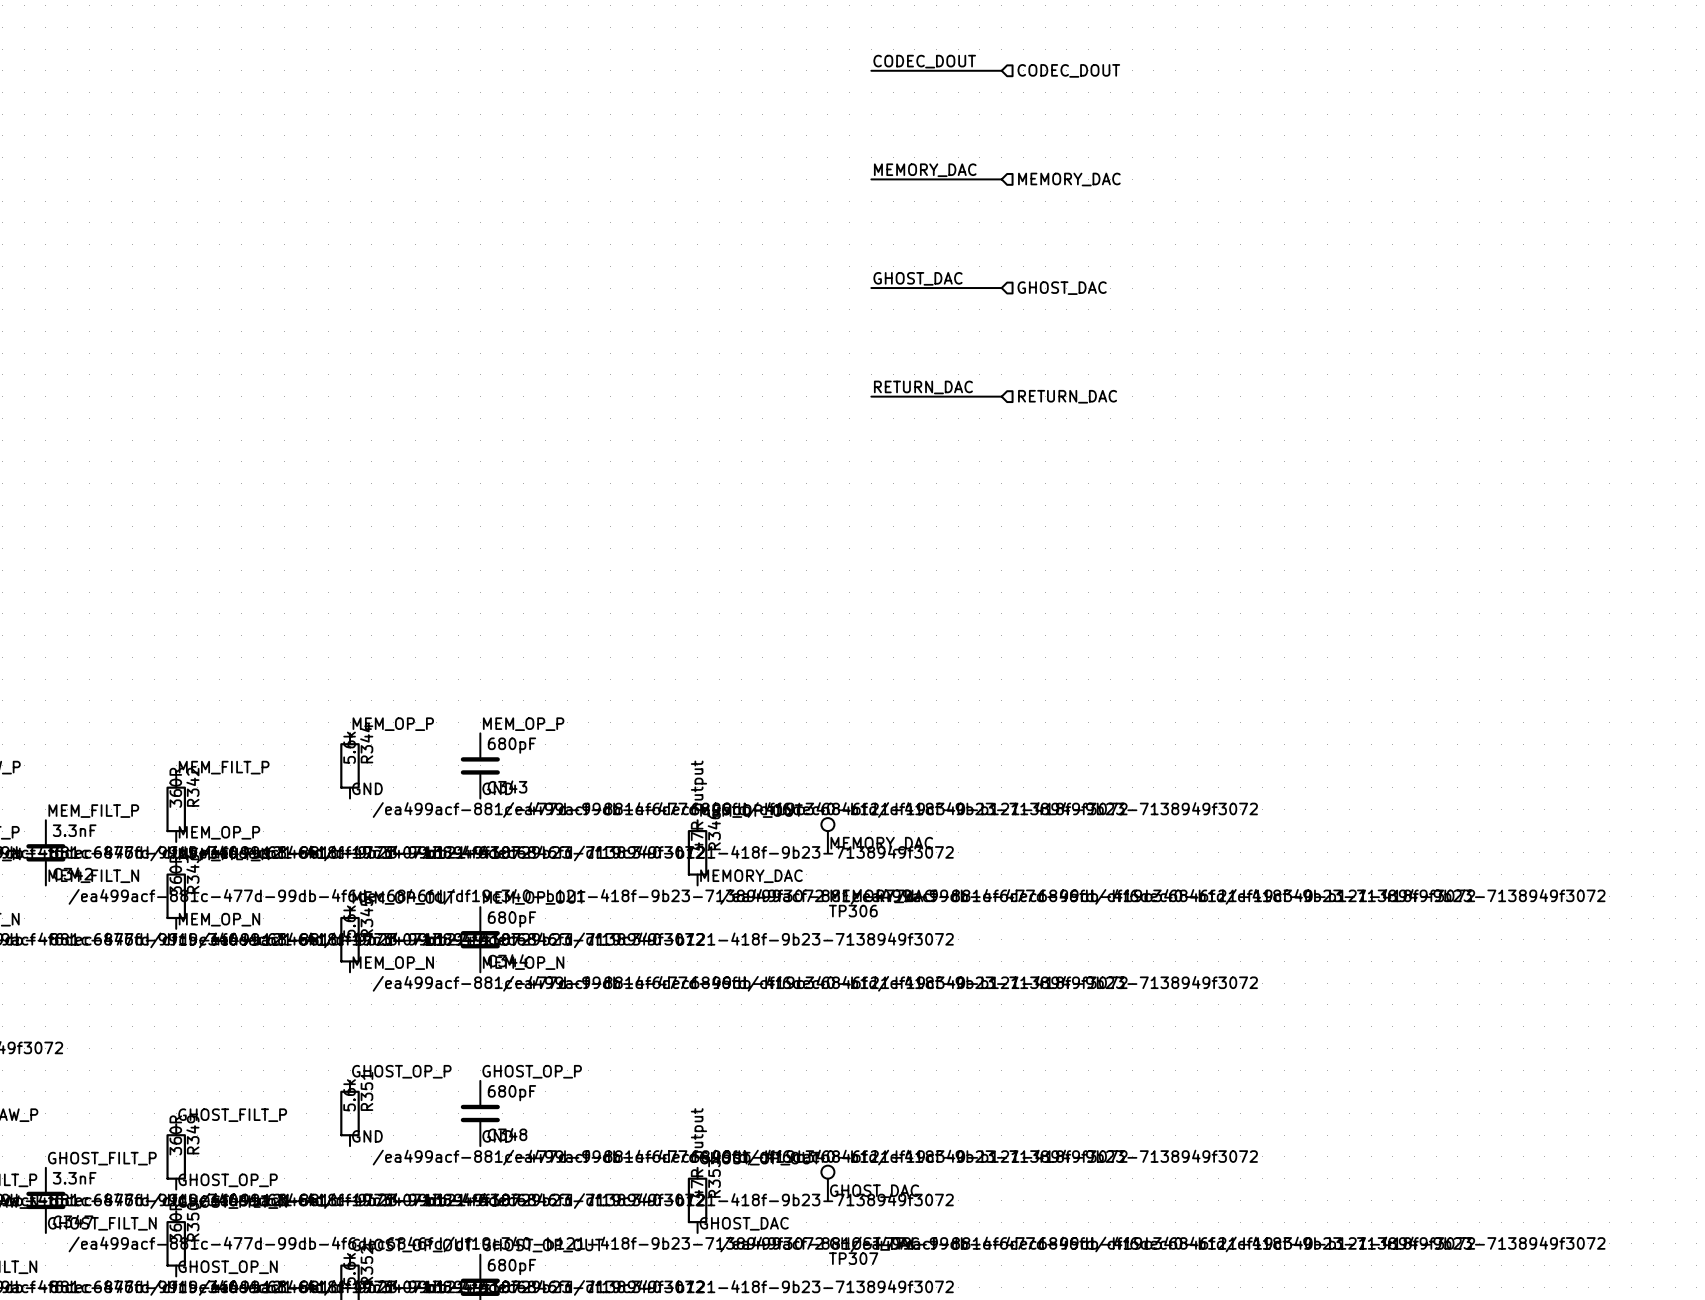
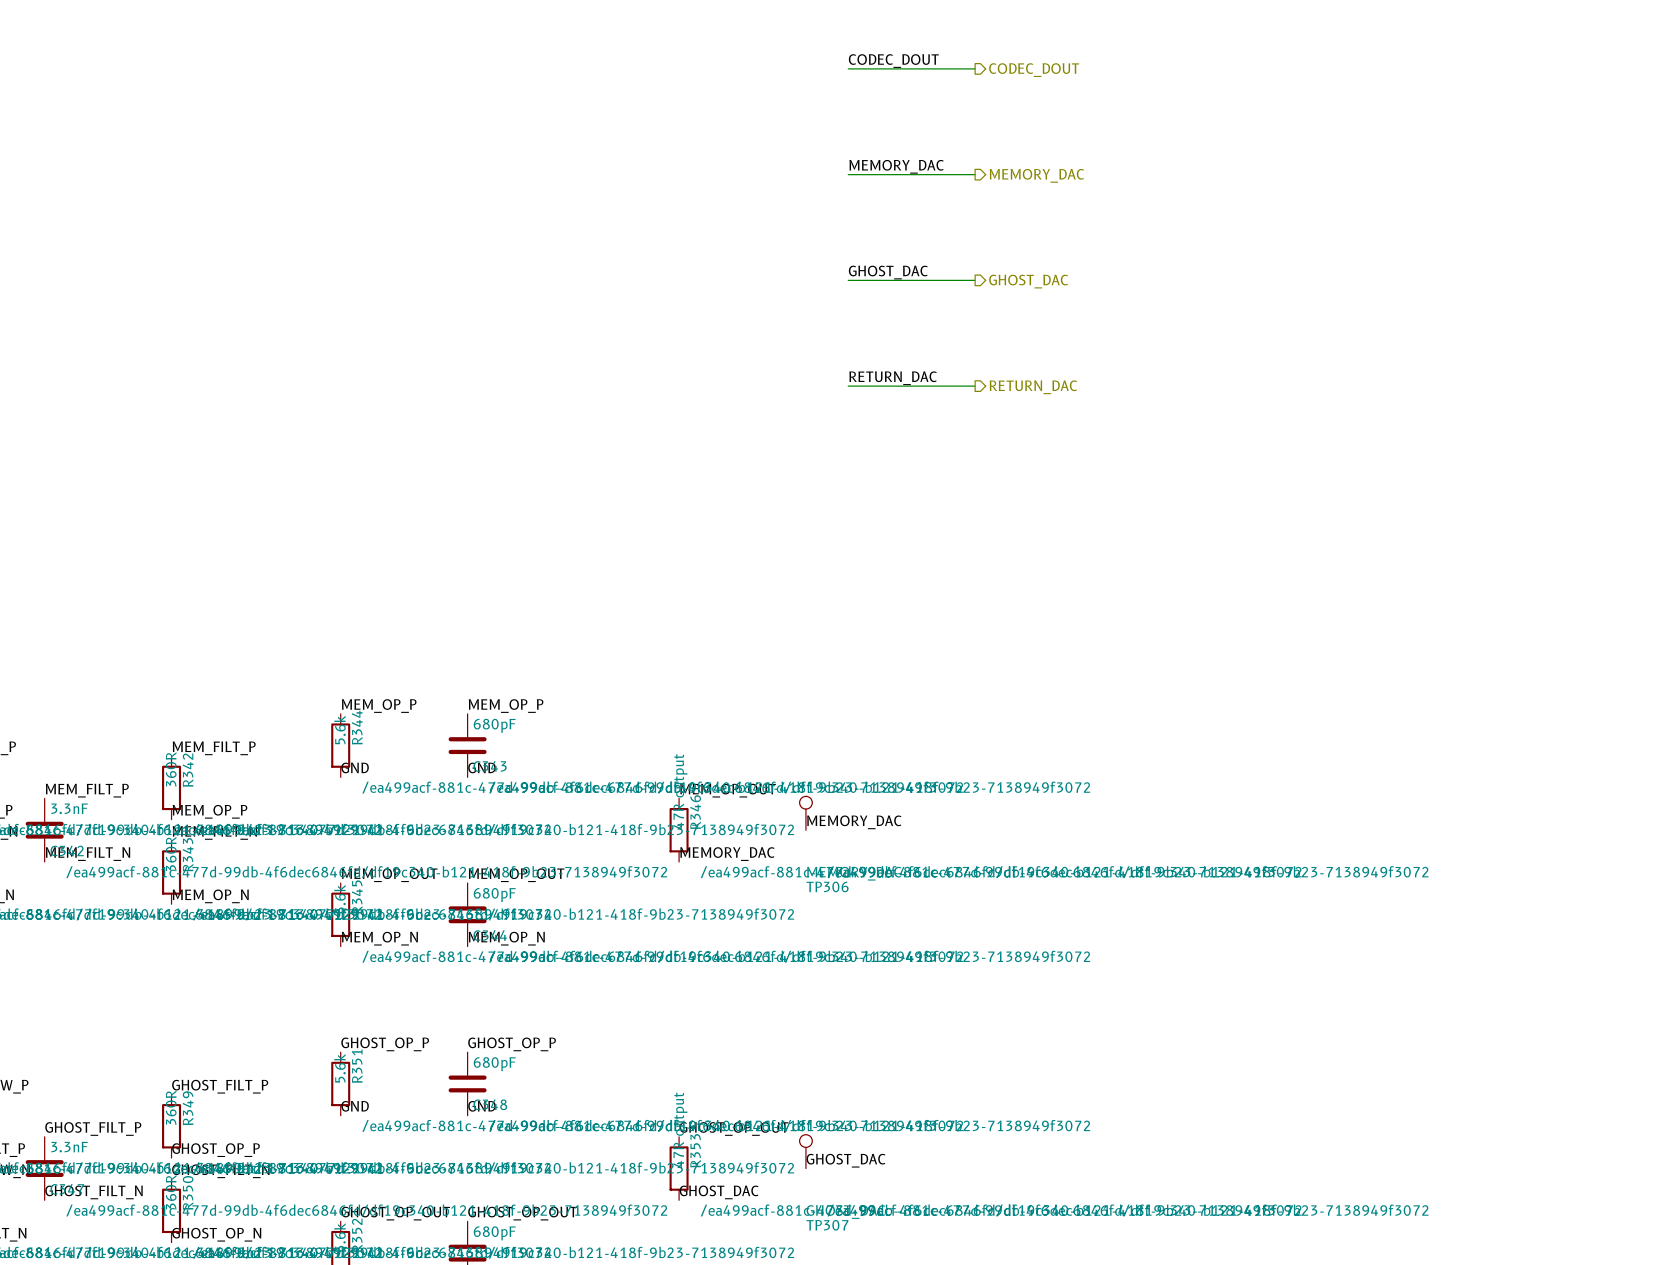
hierarchical label shape: input (1068, 70) -> output (1034, 70)
hierarchical label shape: input (1069, 179) -> output (1036, 175)
hierarchical label shape: input (1062, 288) -> output (1028, 281)
hierarchical label shape: input (1067, 396) -> output (1033, 387)

